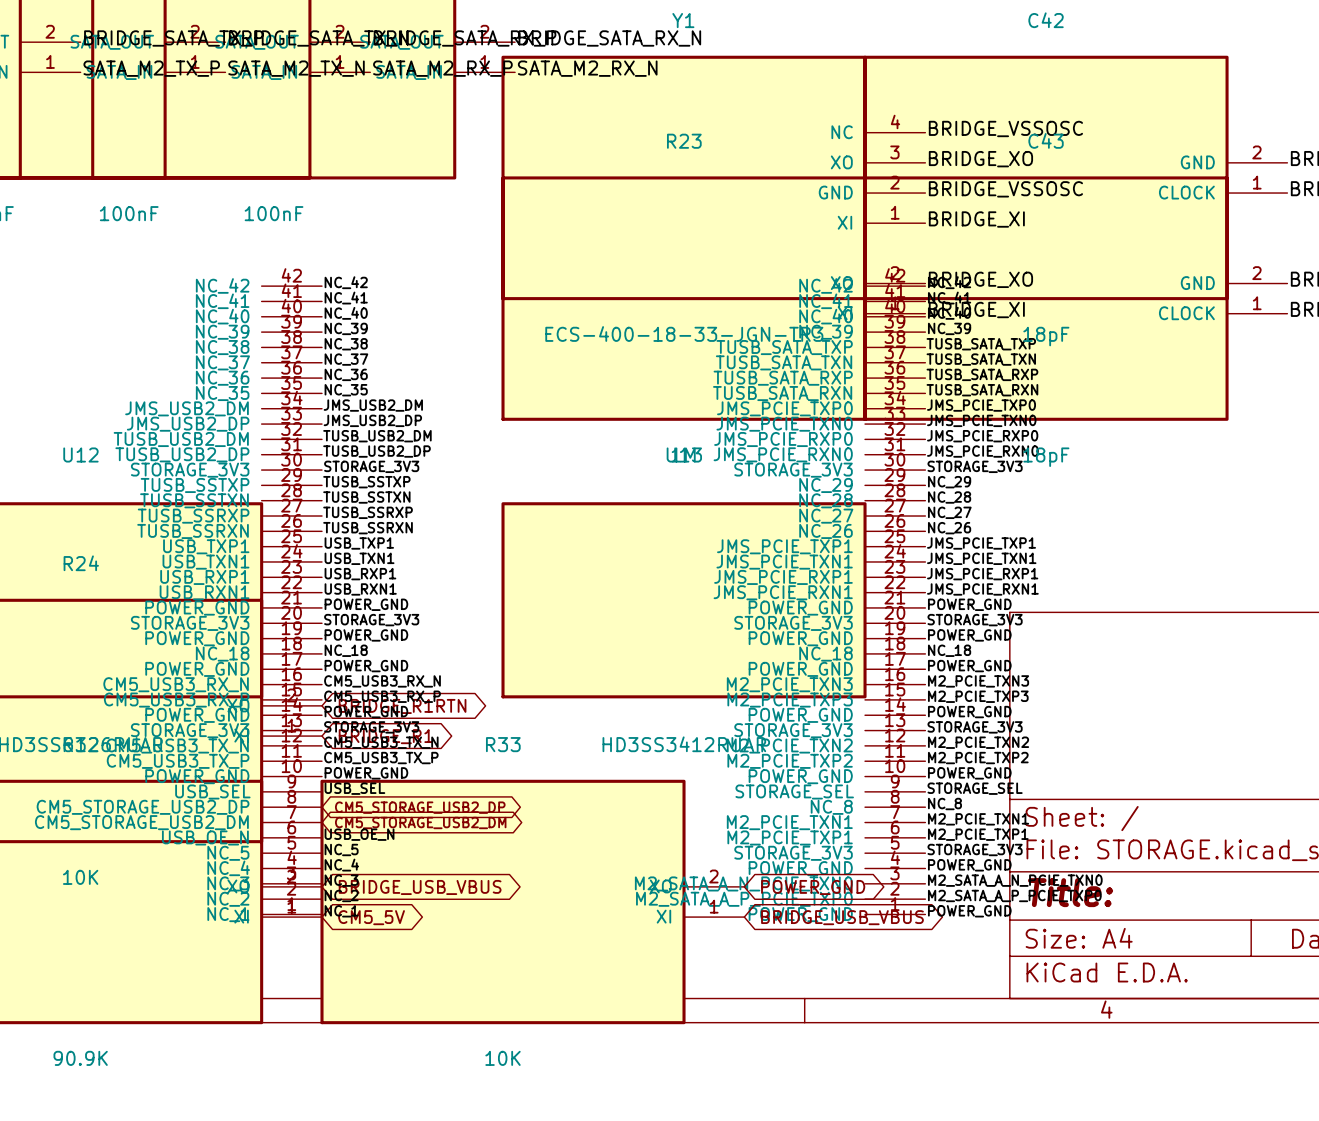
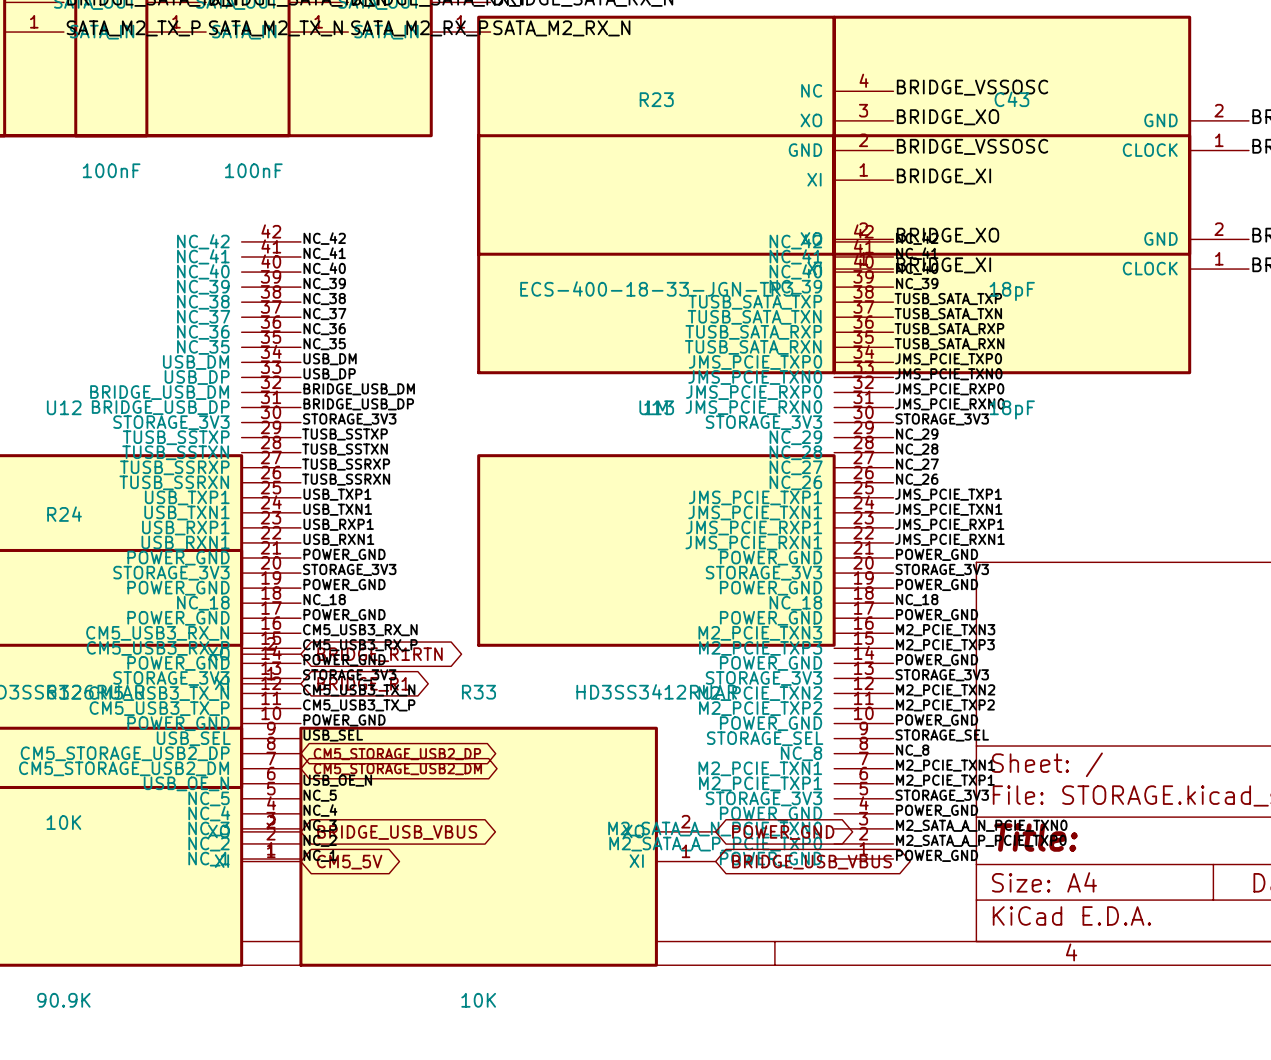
label: JMS_USB2_DM (373, 405) -> USB_DM (330, 359)
U12 pin name: JMS_USB2_DM (187, 408) -> USB_DM (196, 362)
label: JMS_USB2_DP (372, 420) -> USB_DP (329, 374)
U12 pin name: JMS_USB2_DP (188, 424) -> USB_DP (197, 377)
label: TUSB_USB2_DM (377, 436) -> BRIDGE_USB_DM (359, 389)
U12 pin name: TUSB_USB2_DM (181, 439) -> BRIDGE_USB_DM (159, 392)
label: TUSB_USB2_DP (376, 451) -> BRIDGE_USB_DP (358, 404)
U12 pin name: TUSB_USB2_DP (182, 454) -> BRIDGE_USB_DP (160, 407)

